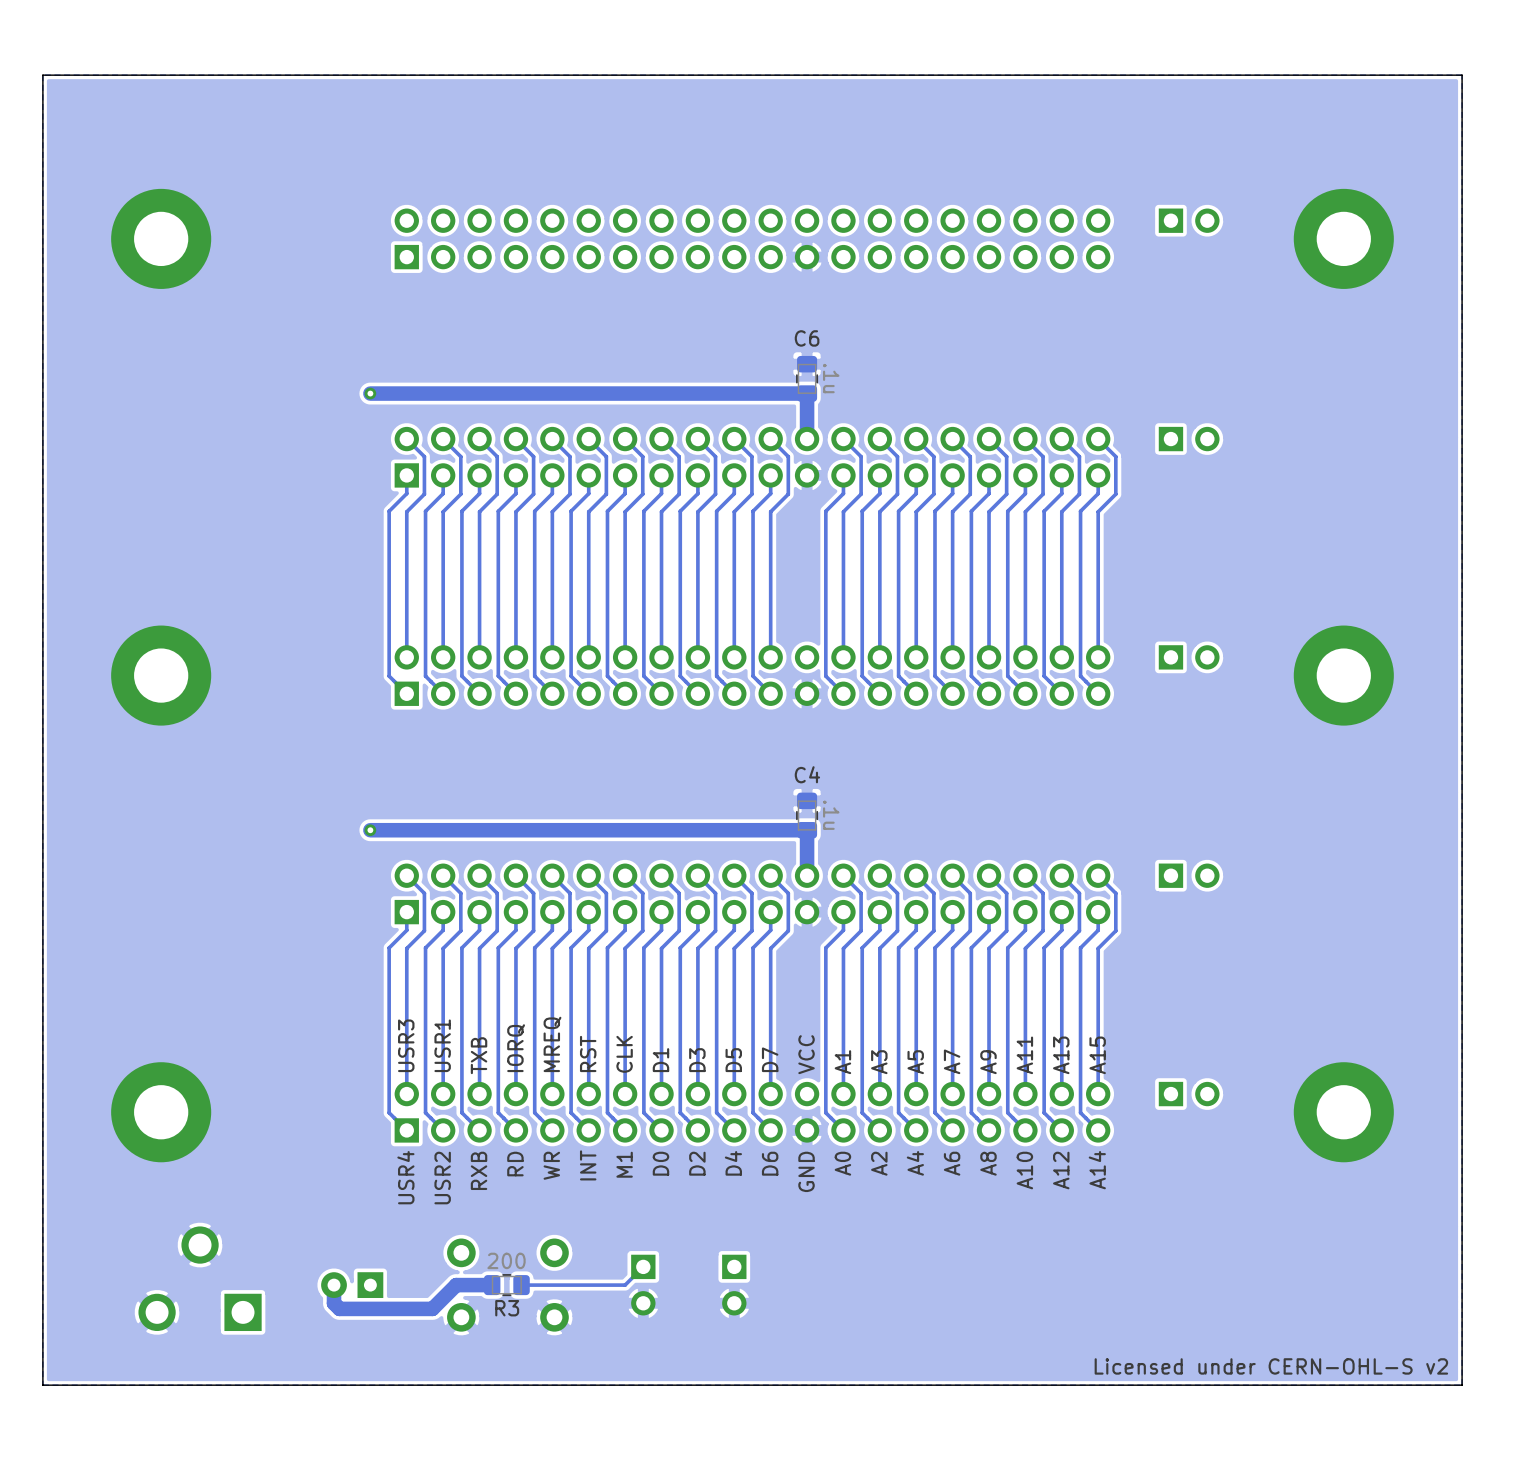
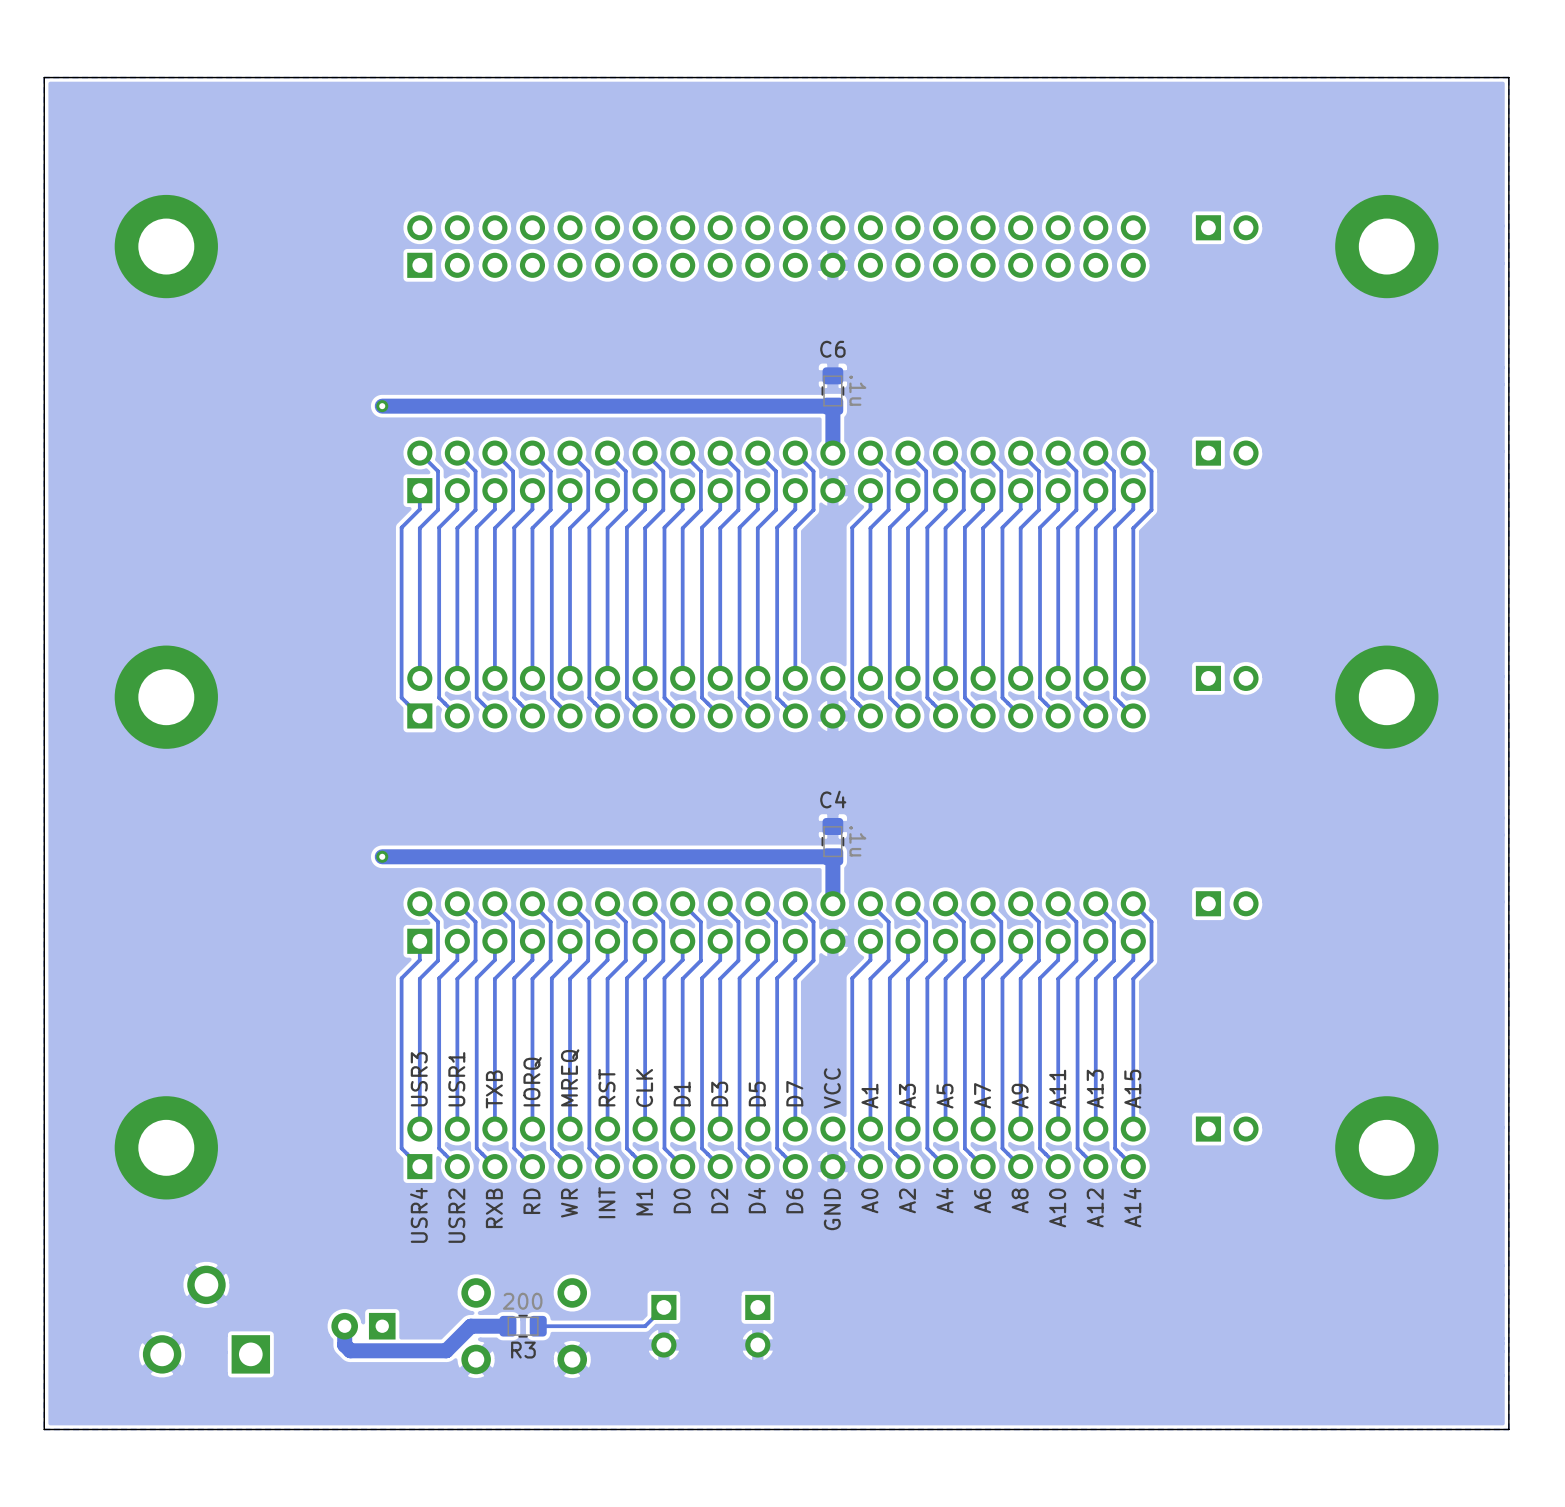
text: Licensed under CERN-OHL-S v2 (1271, 1366) -> none

